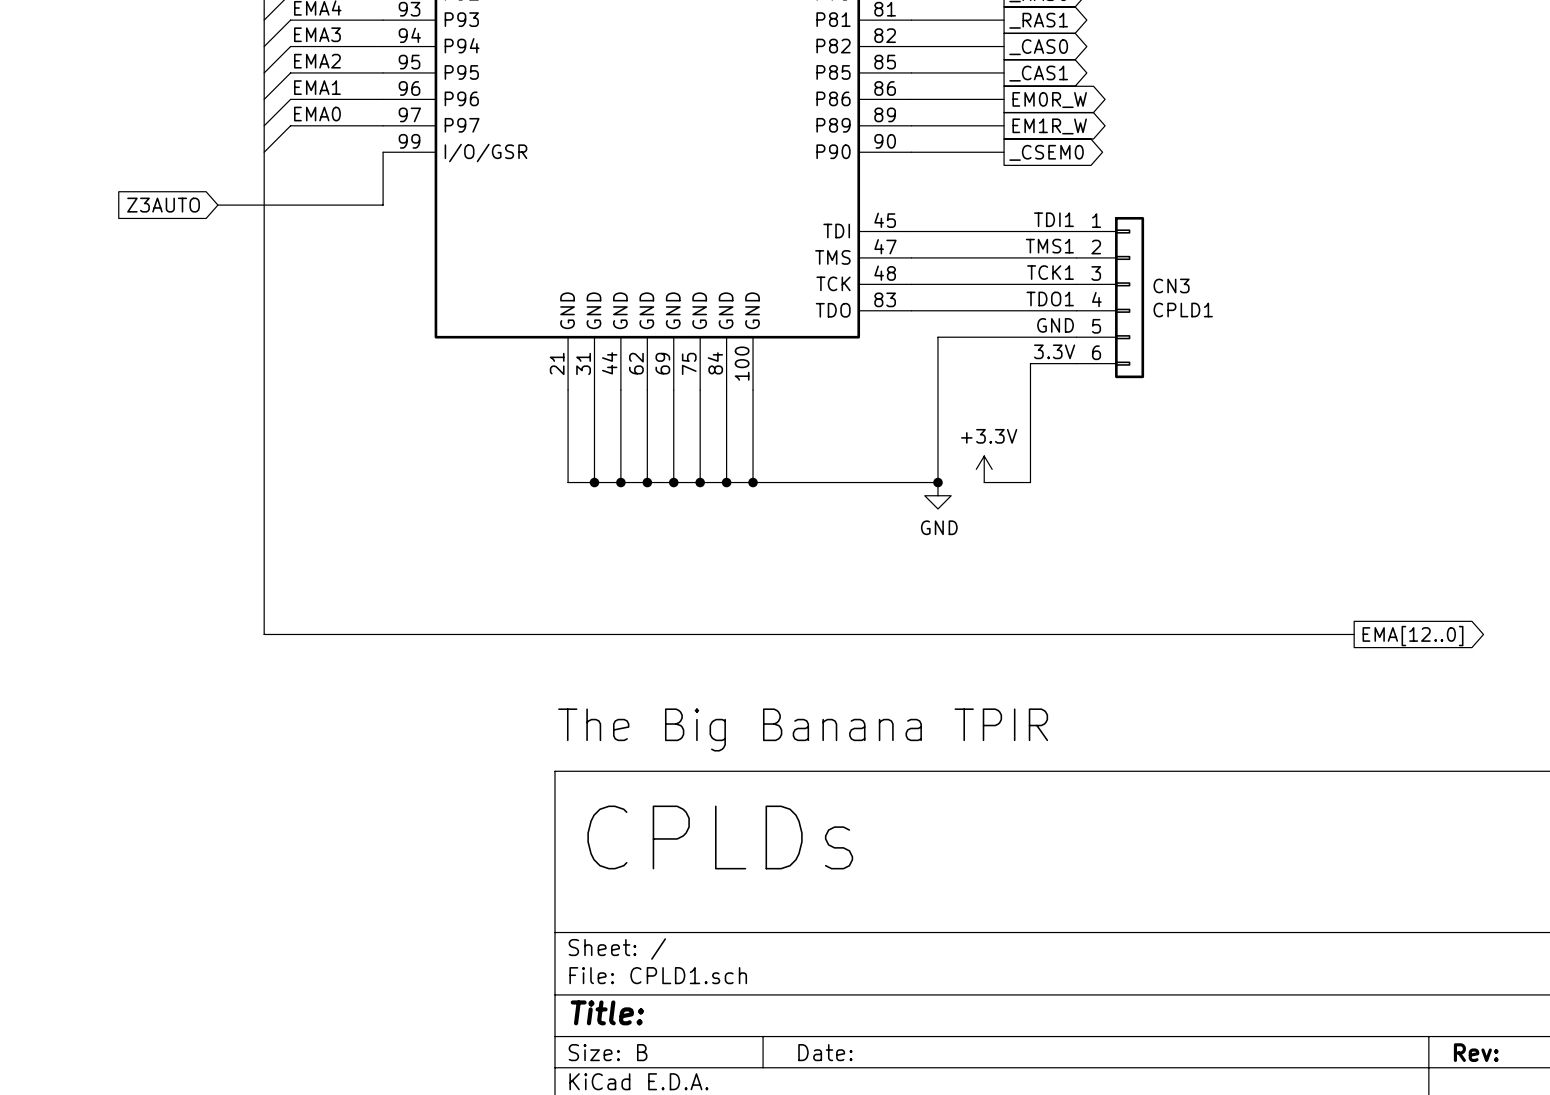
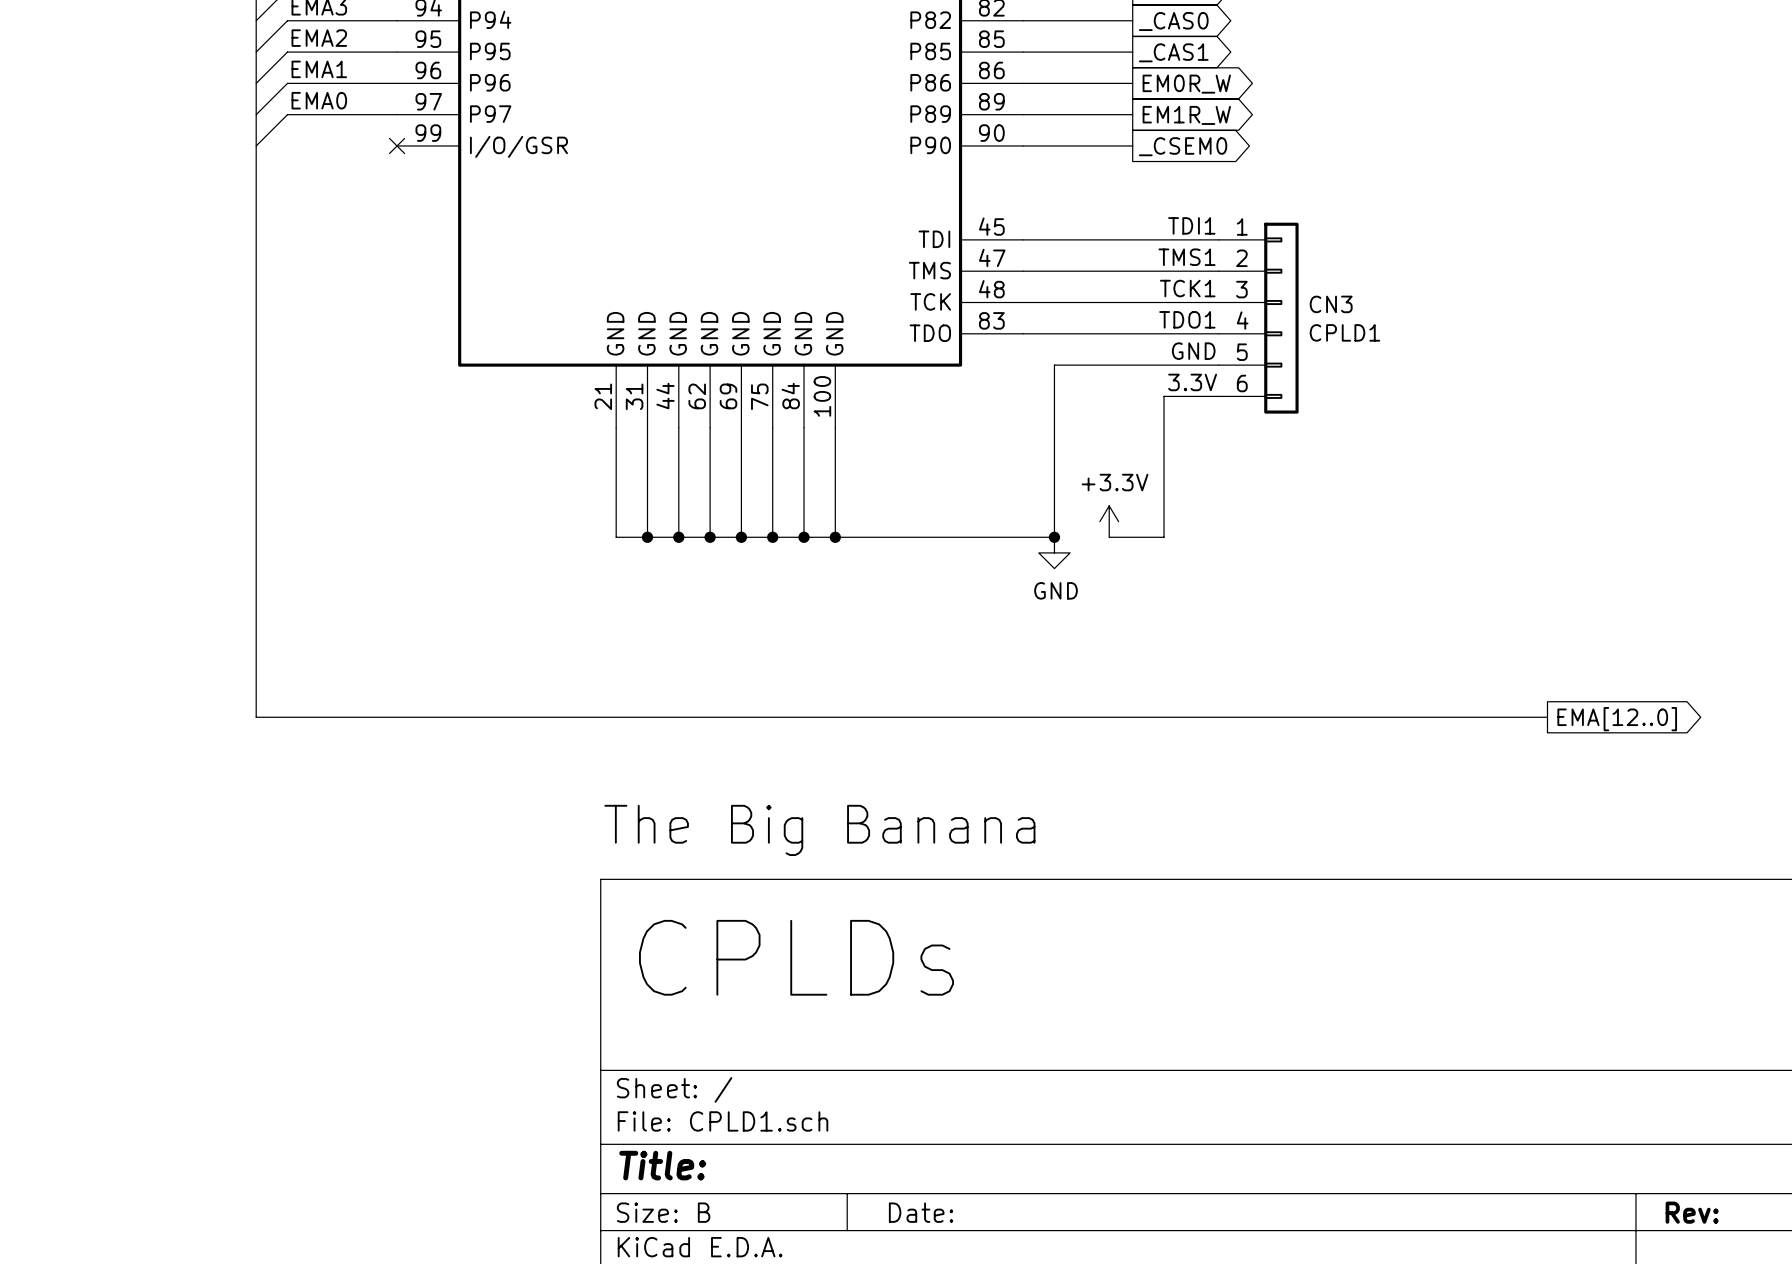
wire: (383, 152) (383, 205) (217, 205) -> none
no-connect mark: none -> (397, 145)
global label: Z3AUTO (163, 205) -> none
text: The Big Banana TPIR (803, 729) -> The Big Banana (819, 830)

